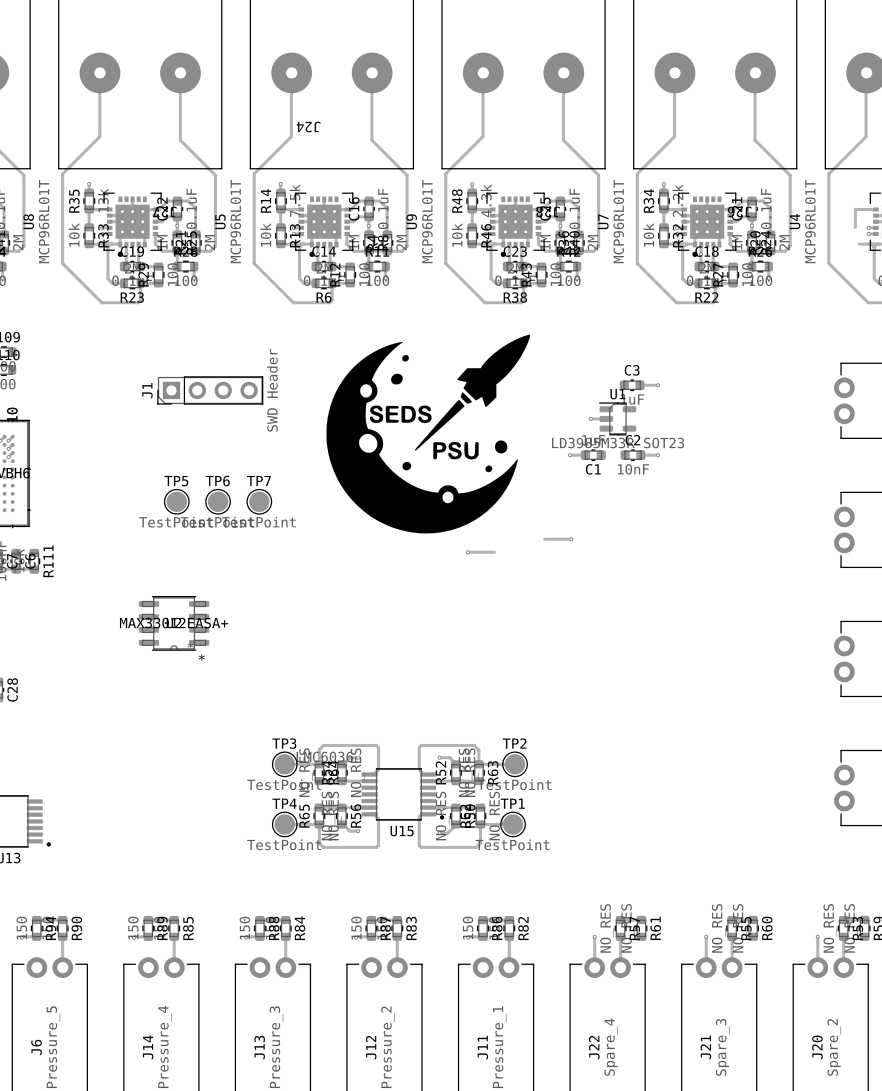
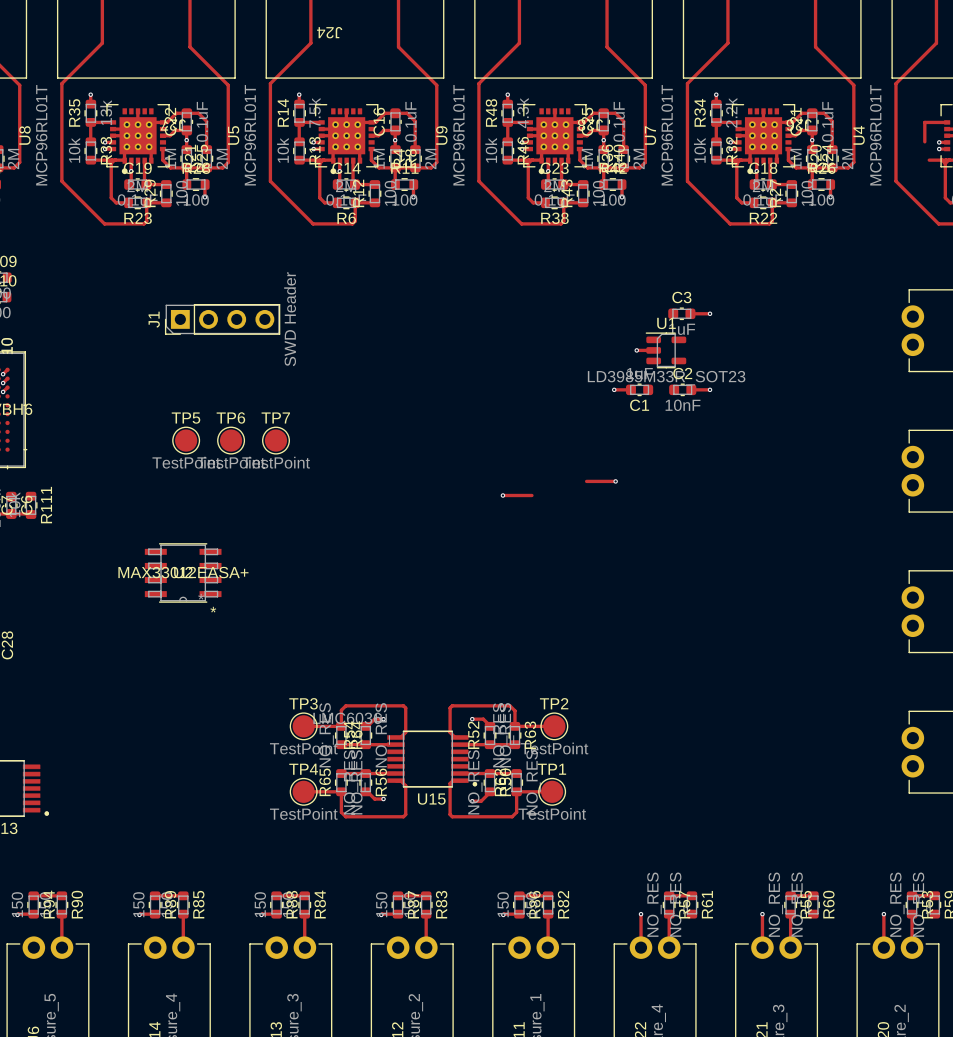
drawing: [326, 334, 531, 534] -> none

